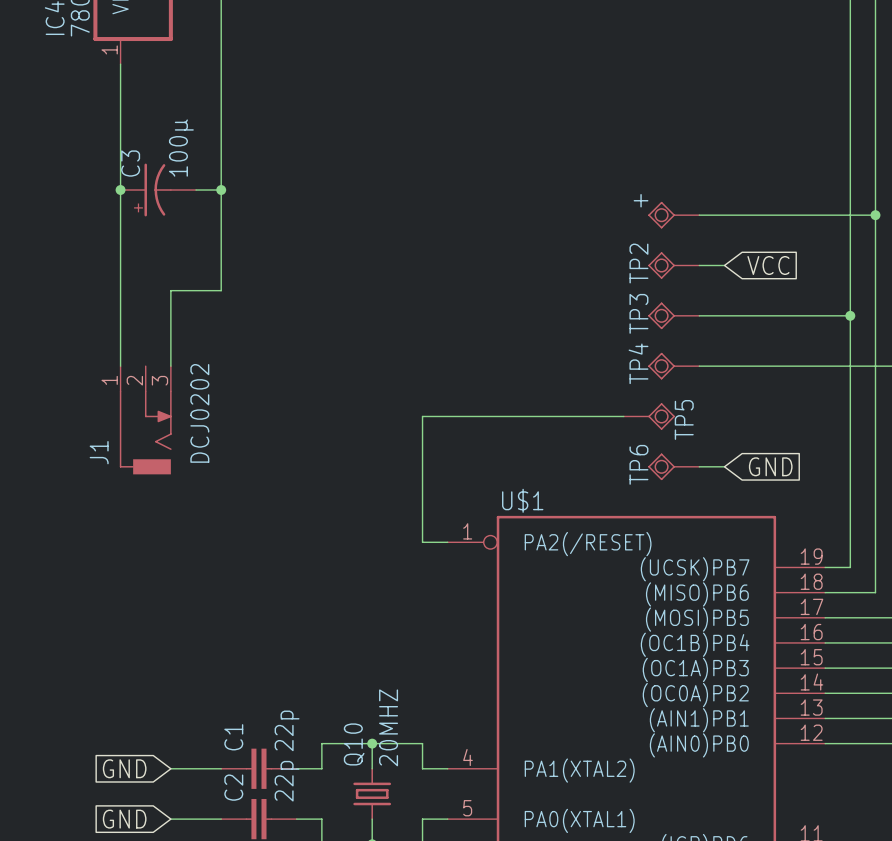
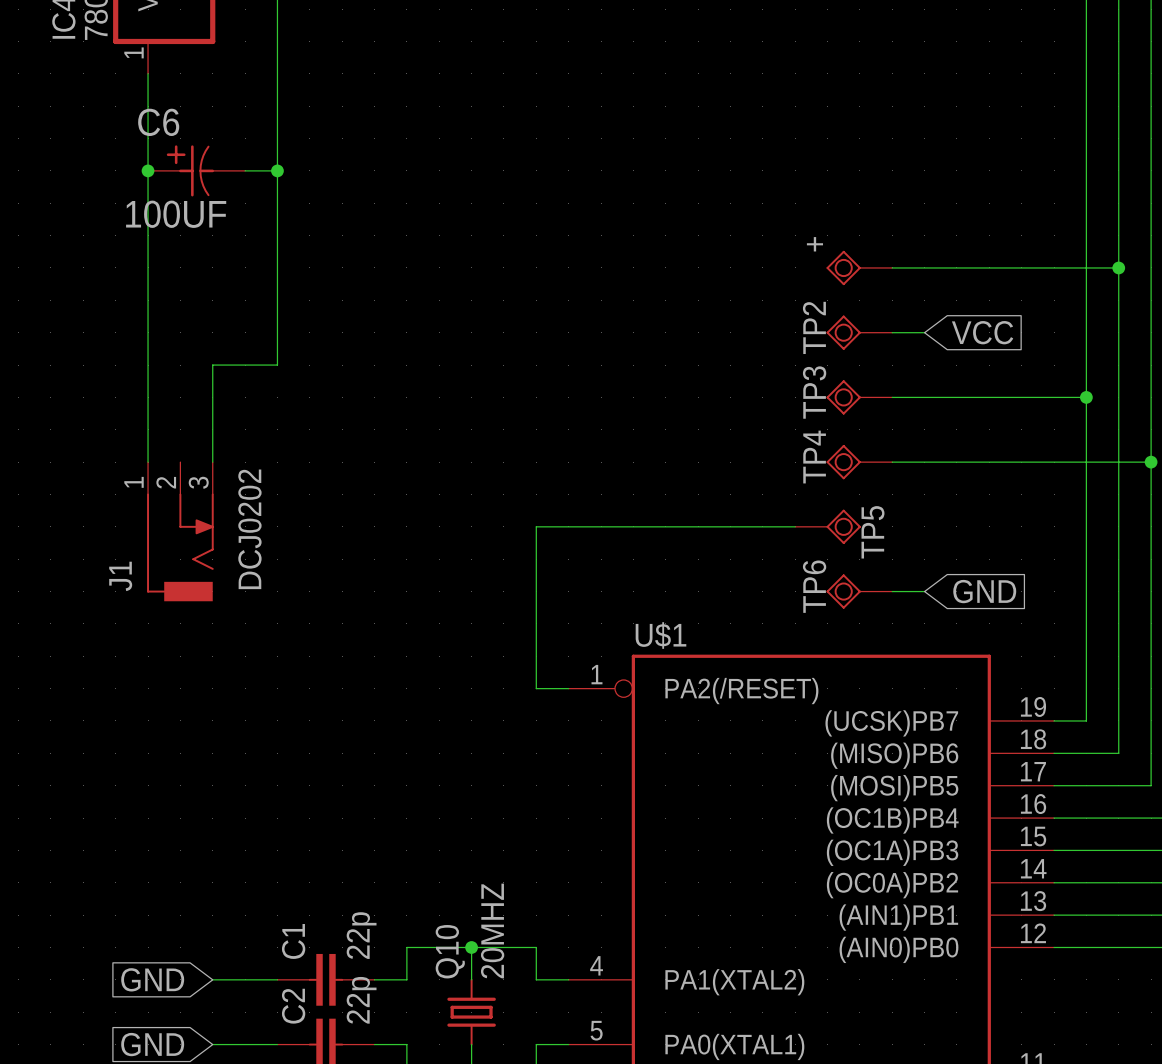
C6: none -> 100UF (196, 170)
junction position: (120, 190) -> (148, 170)
C3: 100µ (158, 190) -> none
wire: (196, 190) (221, 190) -> (245, 170) (277, 170)
junction position: (221, 190) -> (277, 170)

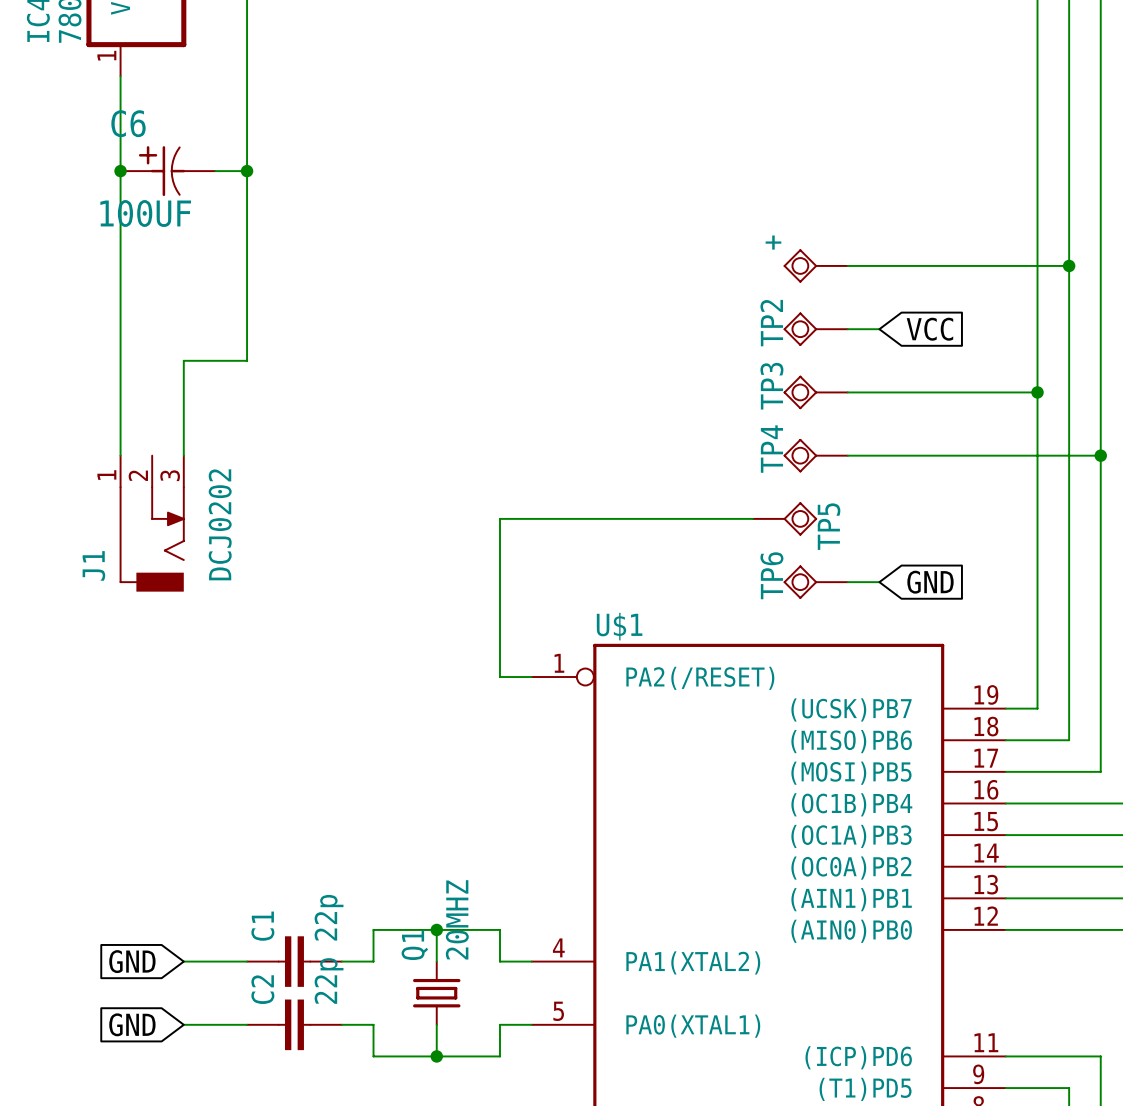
Q10 name: Q10 (450, 951) -> Q1 (414, 945)

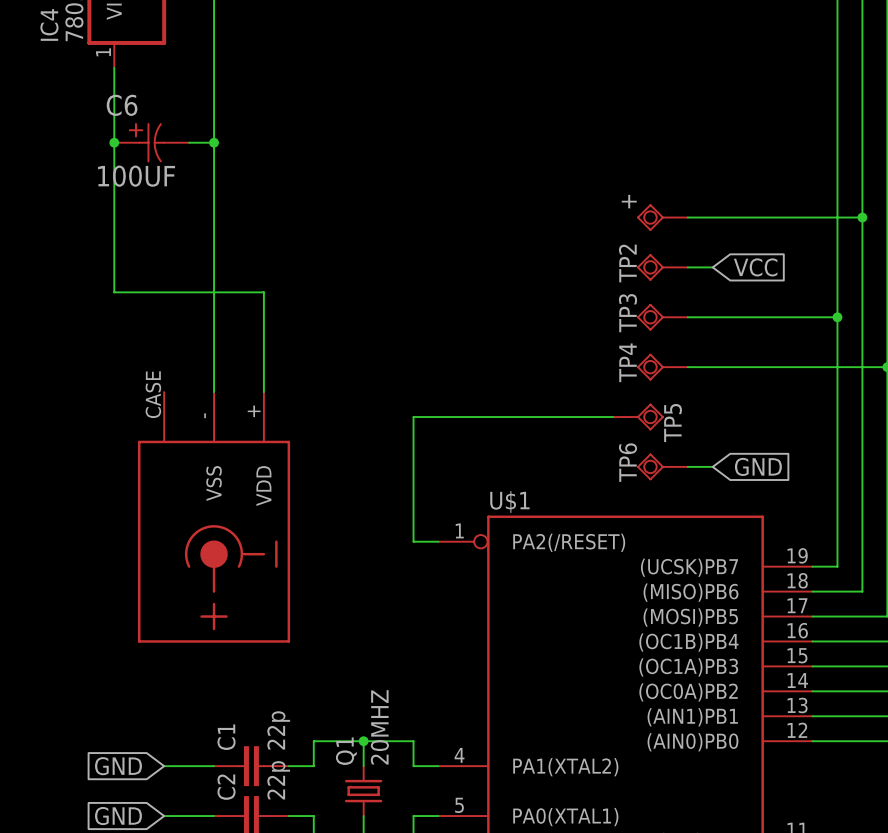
wire: (120, 360) (120, 455) -> (114, 292) (164, 292)
wire: (183, 360) (183, 455) -> none
wire: none -> (214, 392) (214, 292) (263, 292) (263, 392)
J1: DCJ0202 (152, 523) -> none
part: none -> (214, 517)

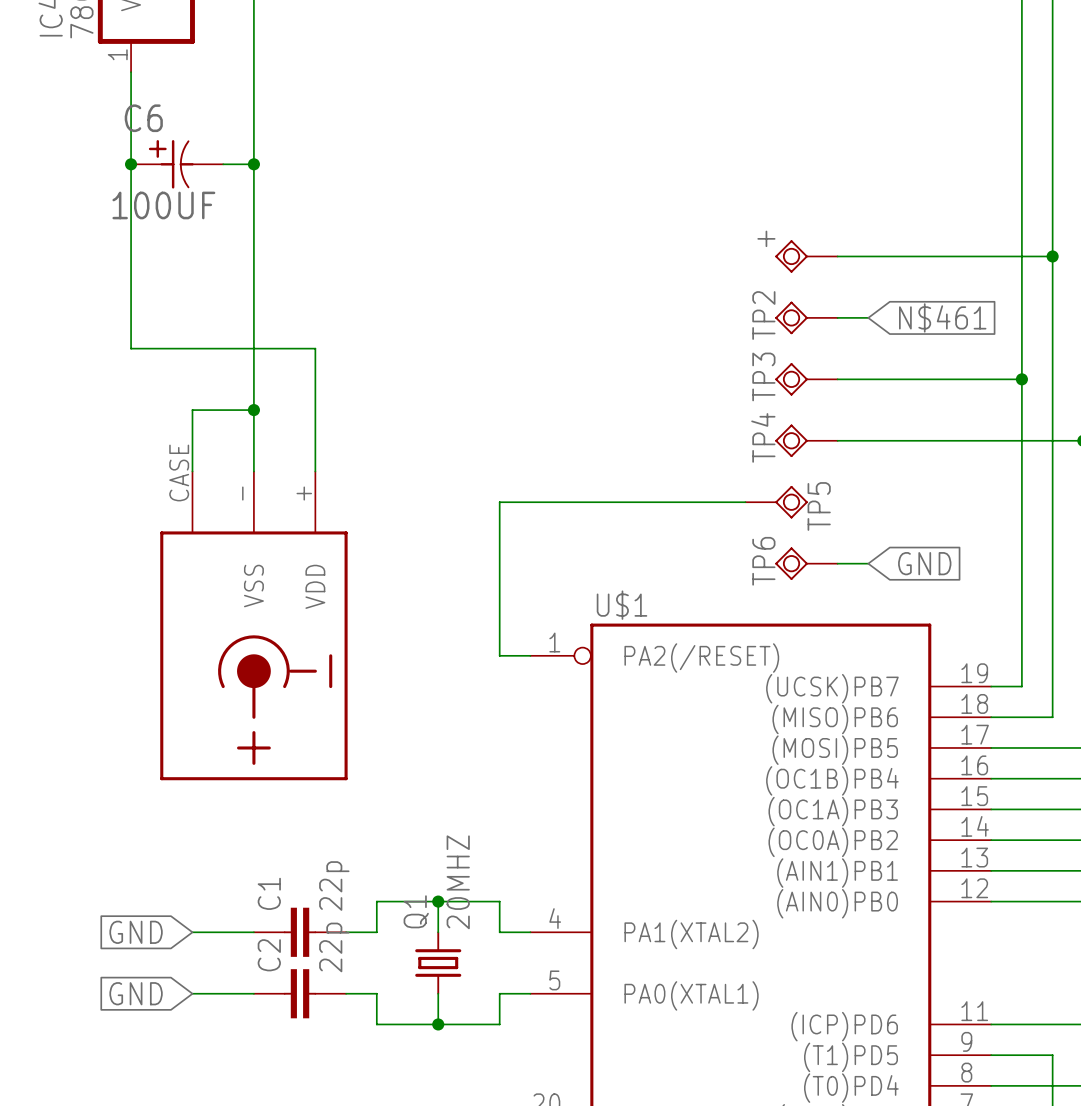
global label: VCC (755, 267) -> N$461 (942, 317)
wire: none -> (253, 410) (192, 410) (192, 471)
junction: none -> (253, 410)

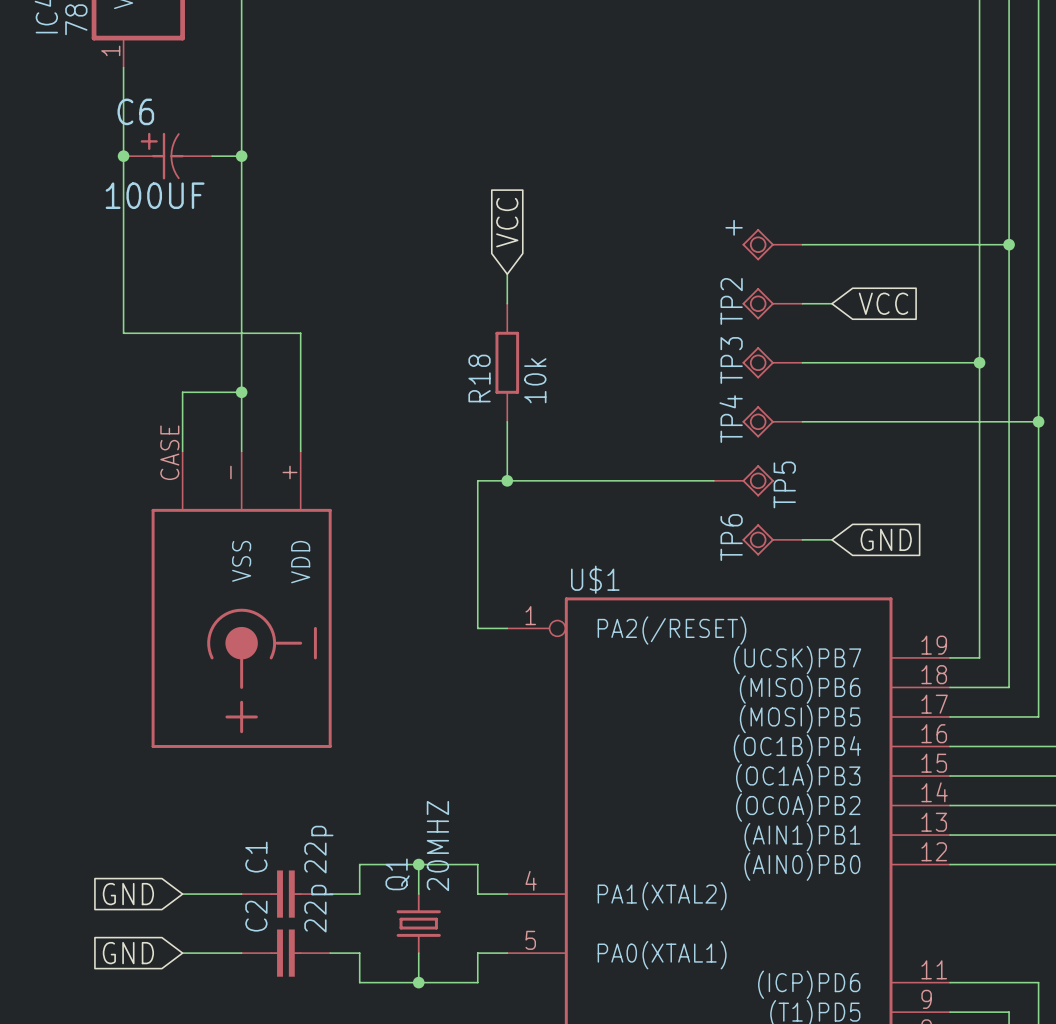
global label: none -> VCC (507, 222)
wire: none -> (507, 274) (507, 303)
global label: N$461 (942, 317) -> VCC (883, 303)
R18: none -> 10k (507, 362)
wire: none -> (507, 421) (507, 480)
junction: none -> (507, 480)

